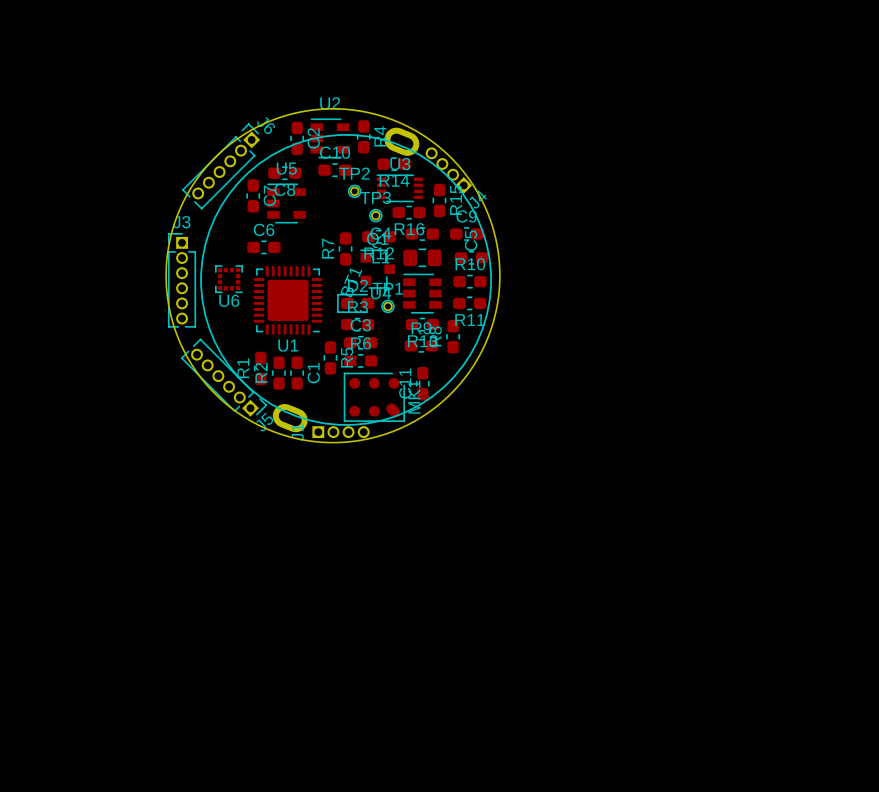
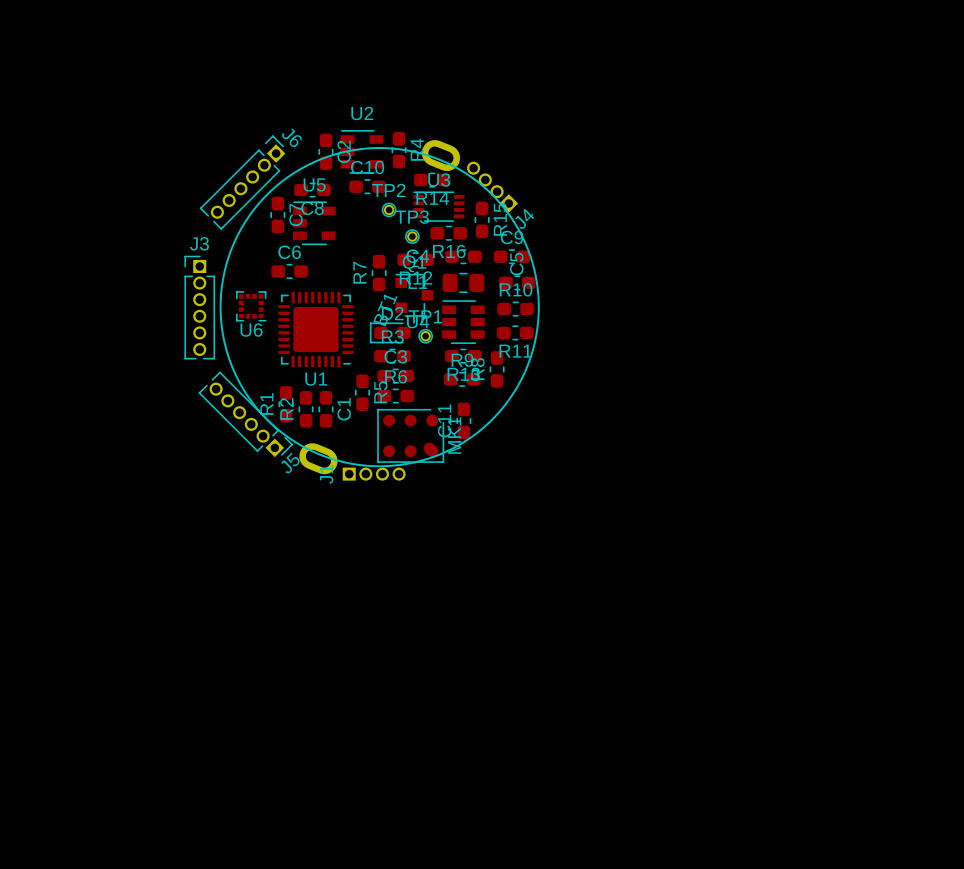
round board edge: [165, 108, 501, 444] -> none

